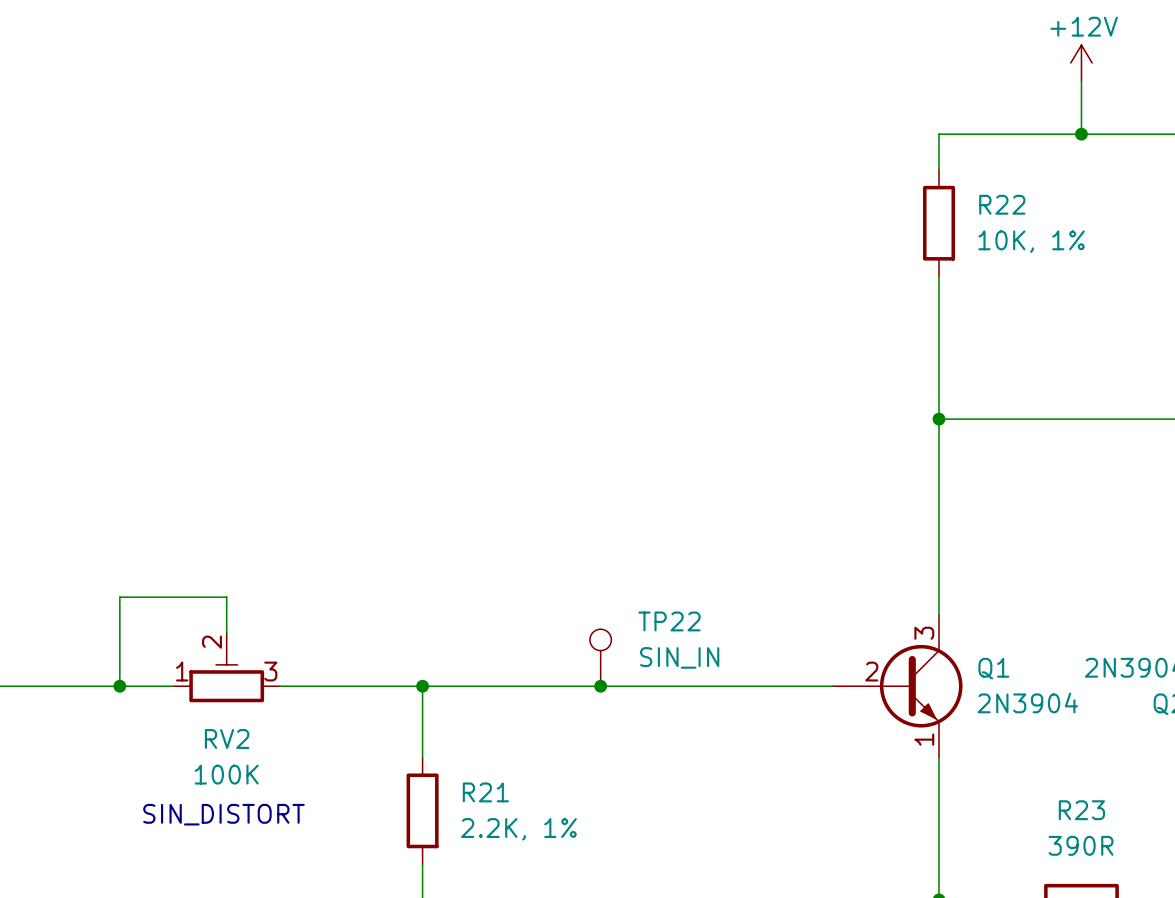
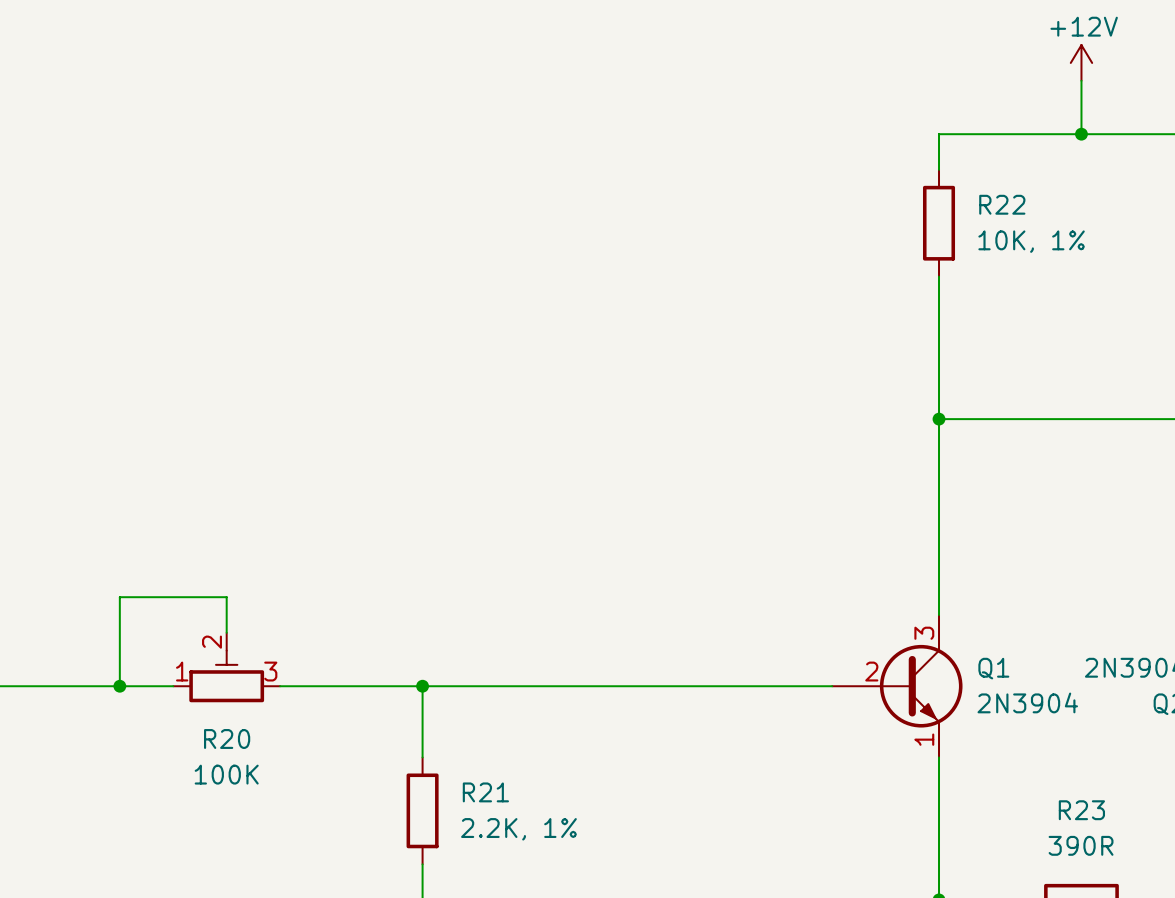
TP22: SIN_IN (600, 657) -> none
junction: (600, 686) -> none
RV2 name: RV2 (227, 738) -> R20 (227, 738)
text: SIN_DISTORT (223, 814) -> none

